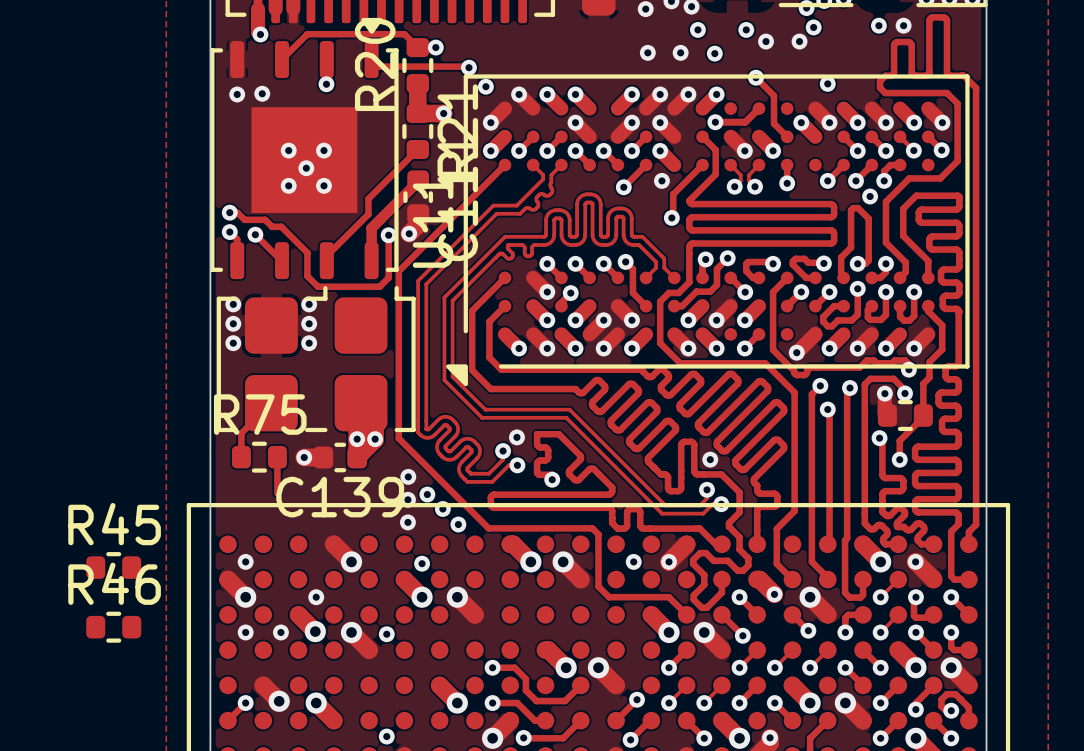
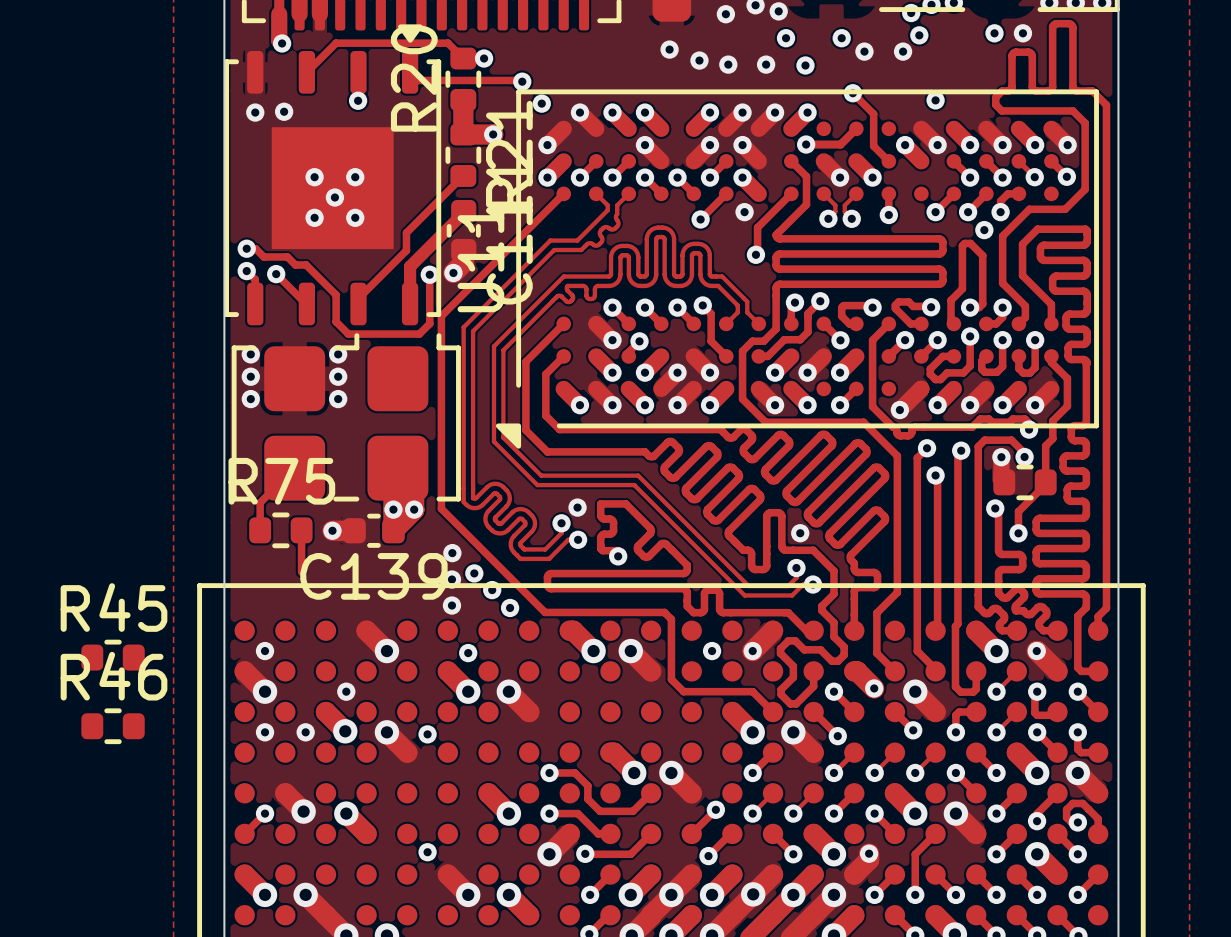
via: none -> (669, 49)
via: none -> (699, 60)

